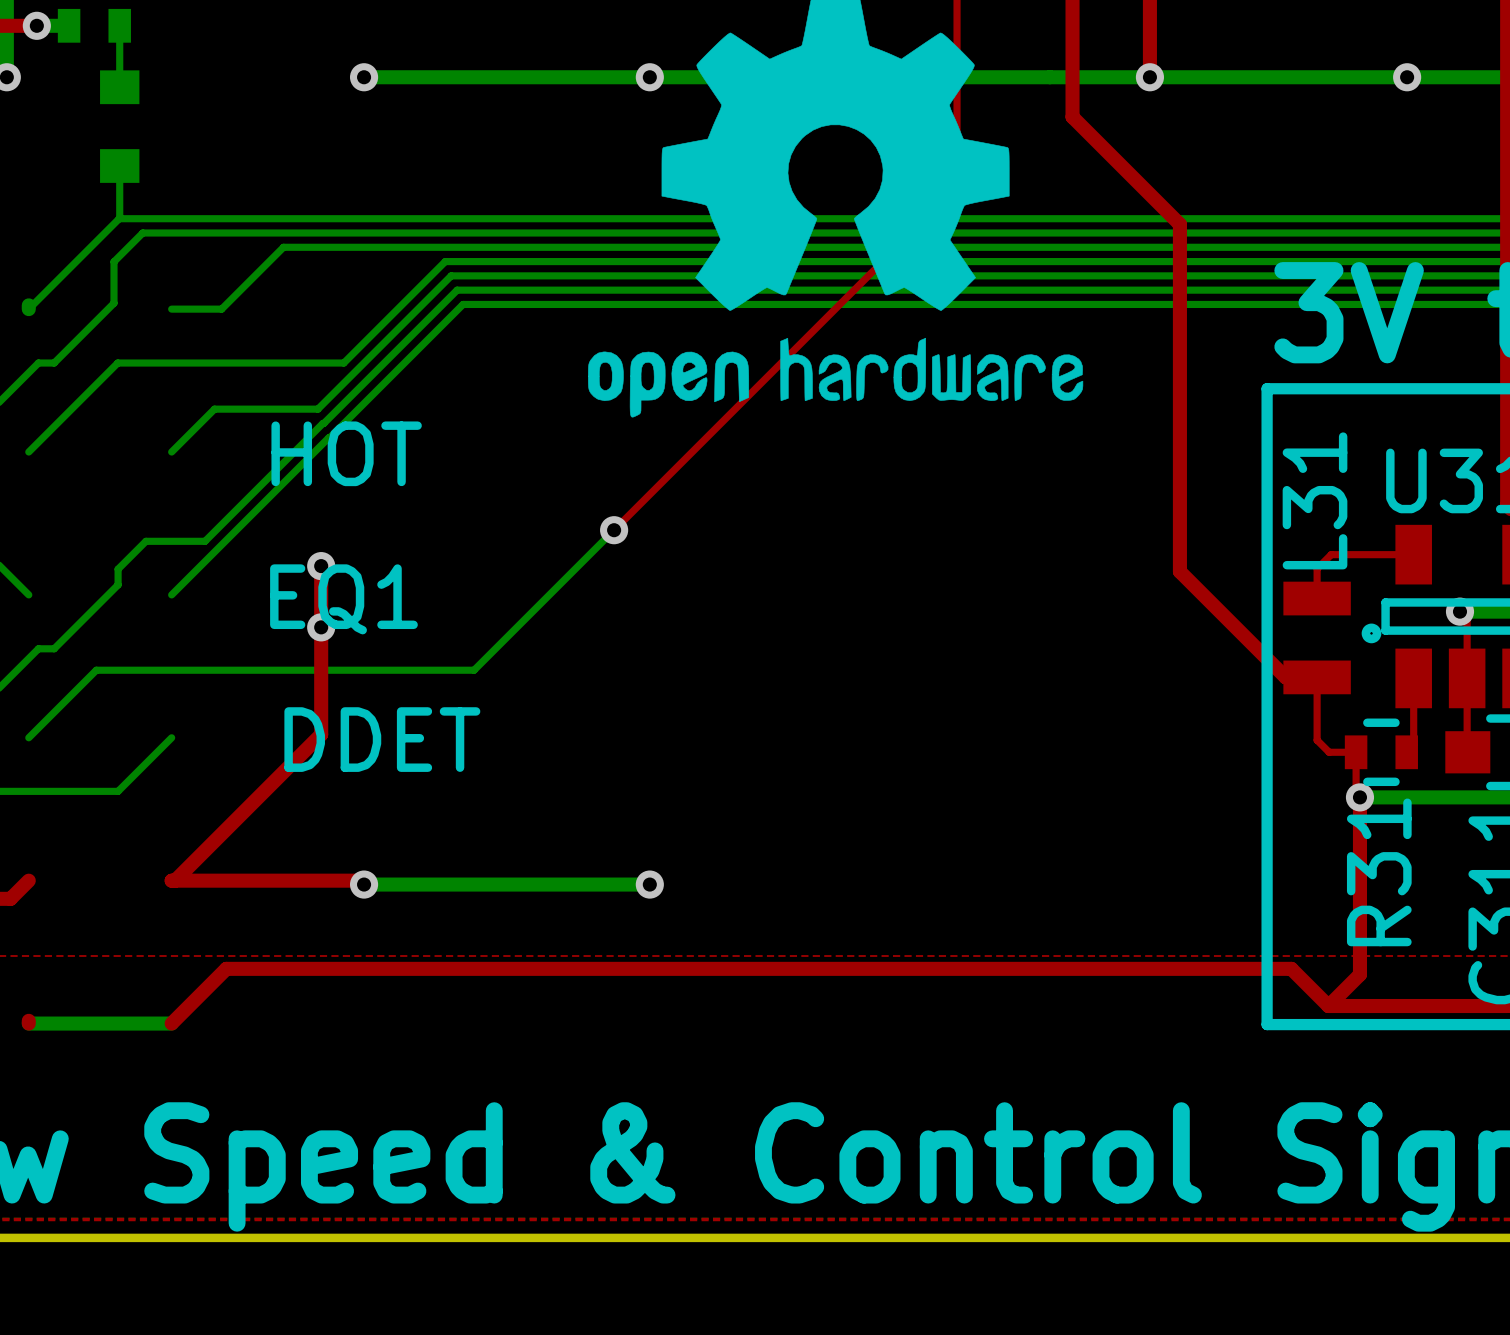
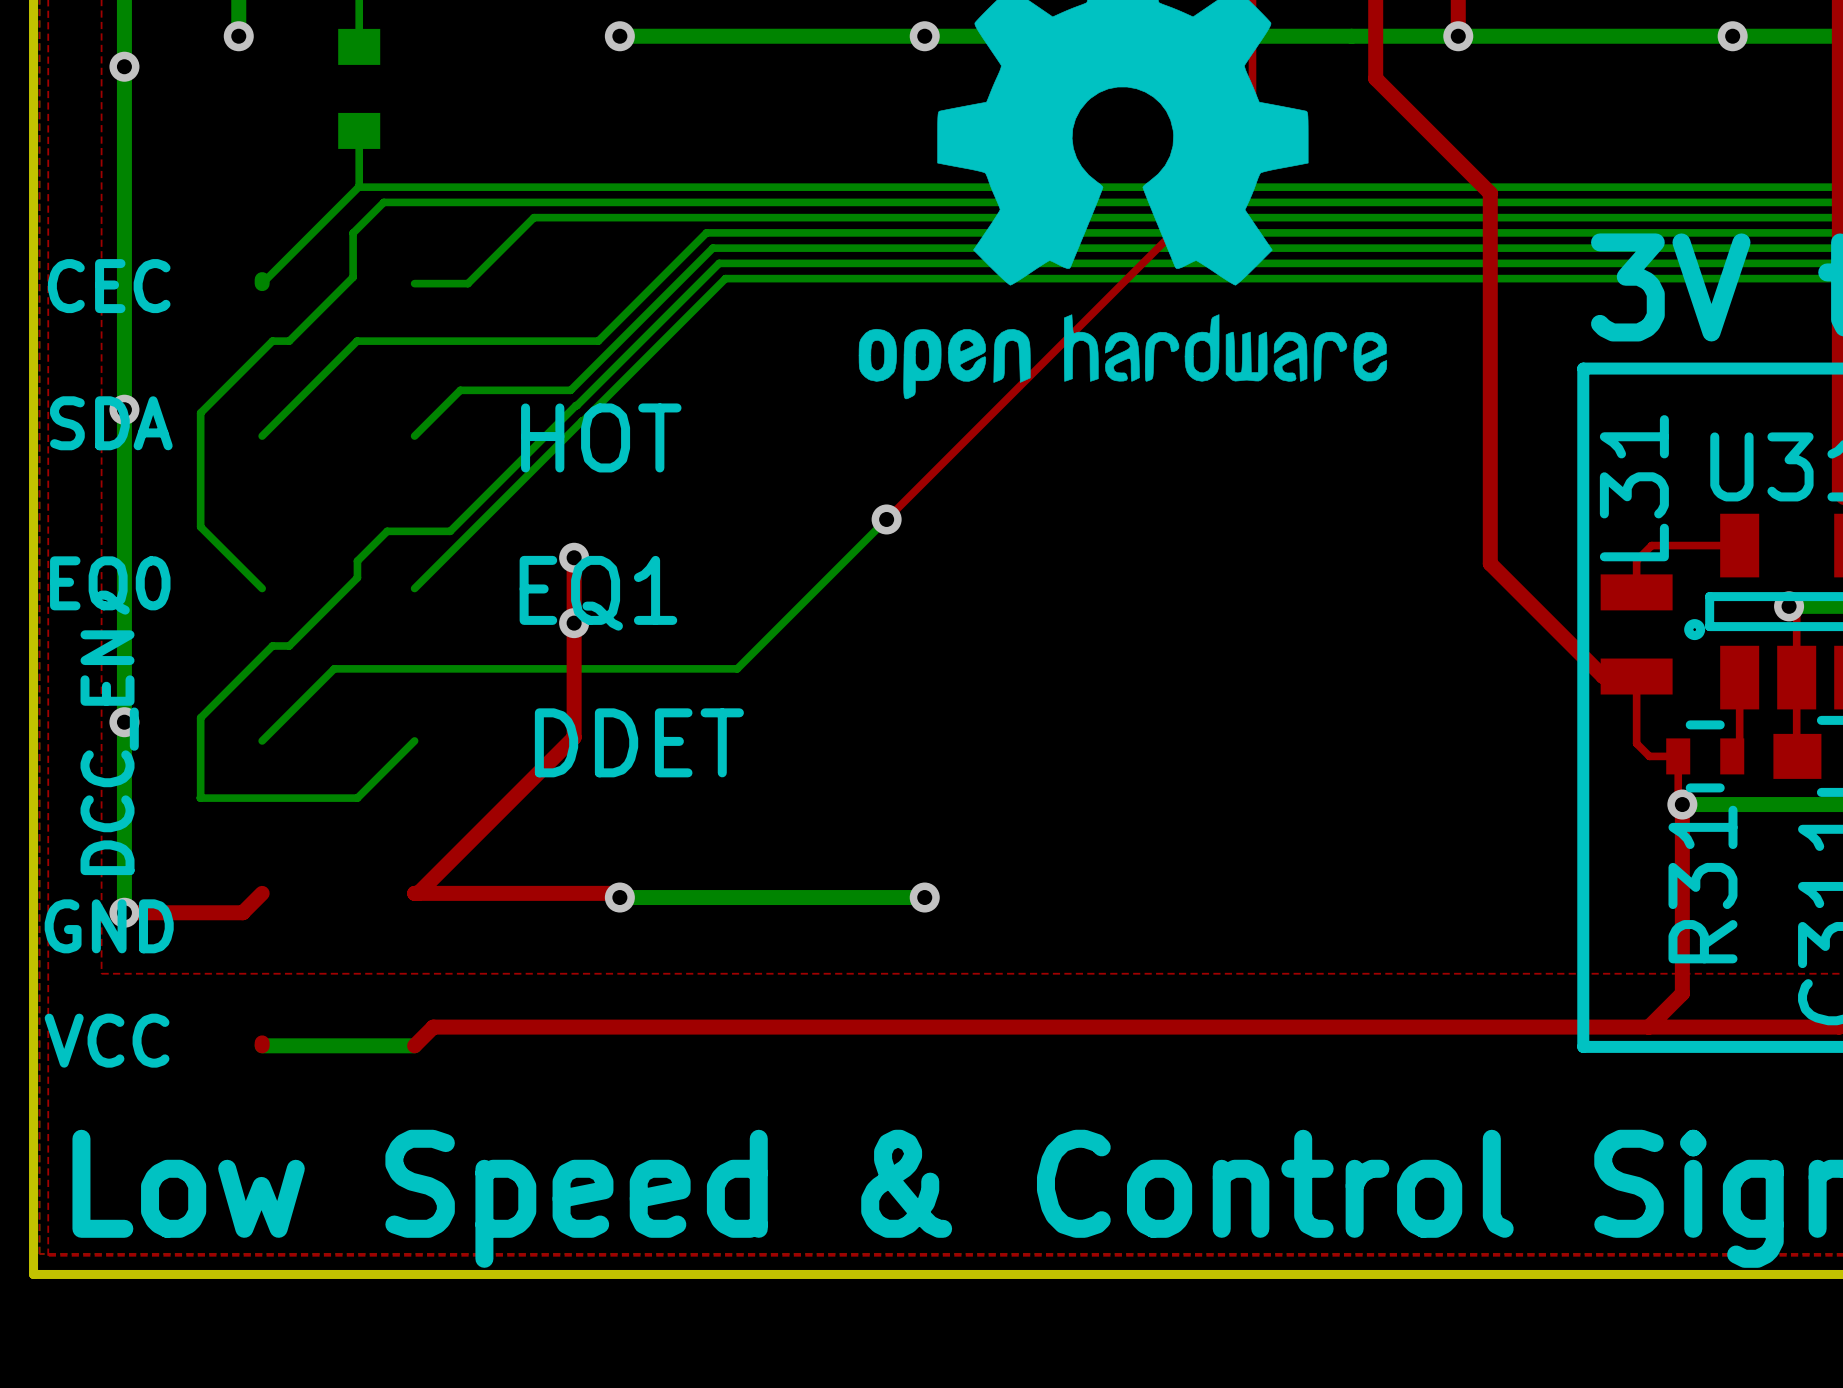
top track: (189, 1006) (226, 968) (1291, 968) (1328, 1006) -> (433, 1027) (1648, 1027)

